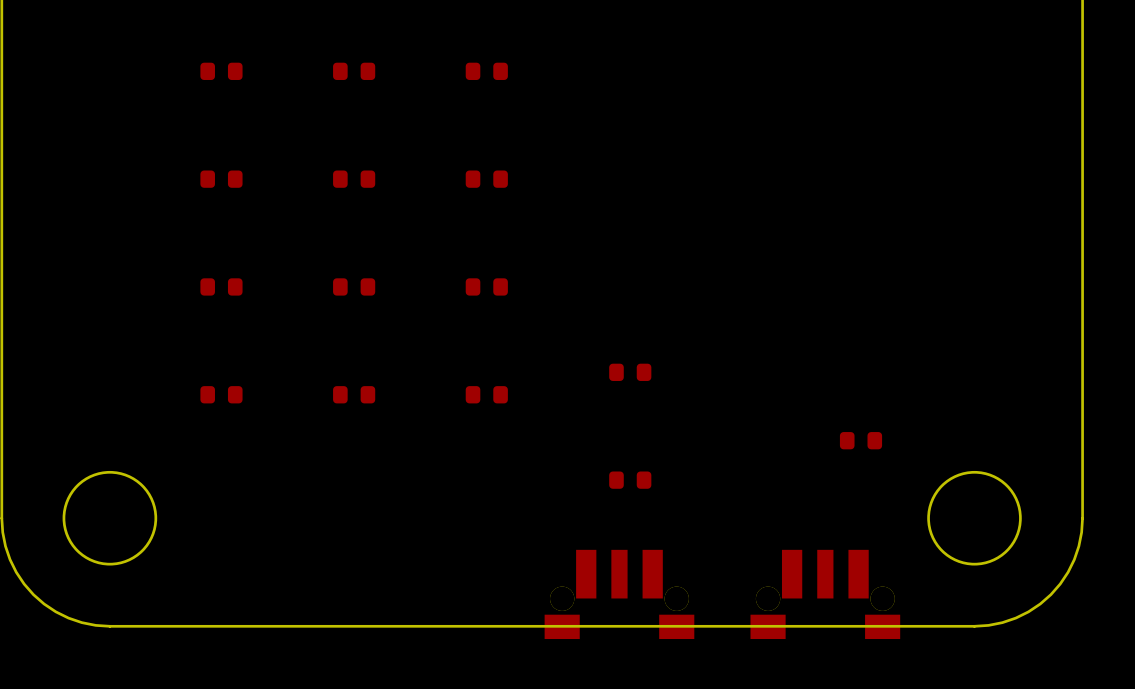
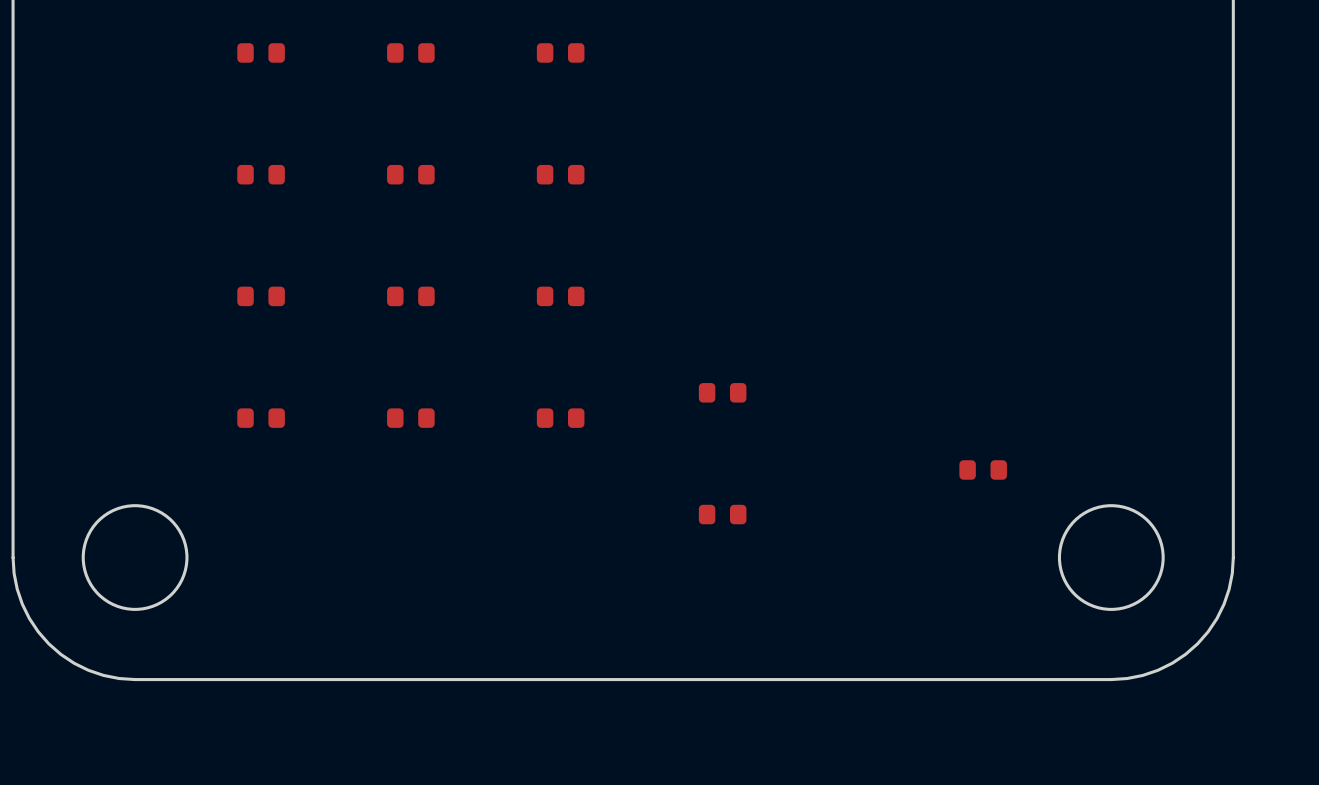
part: (619, 594) -> none
part: (825, 594) -> none

